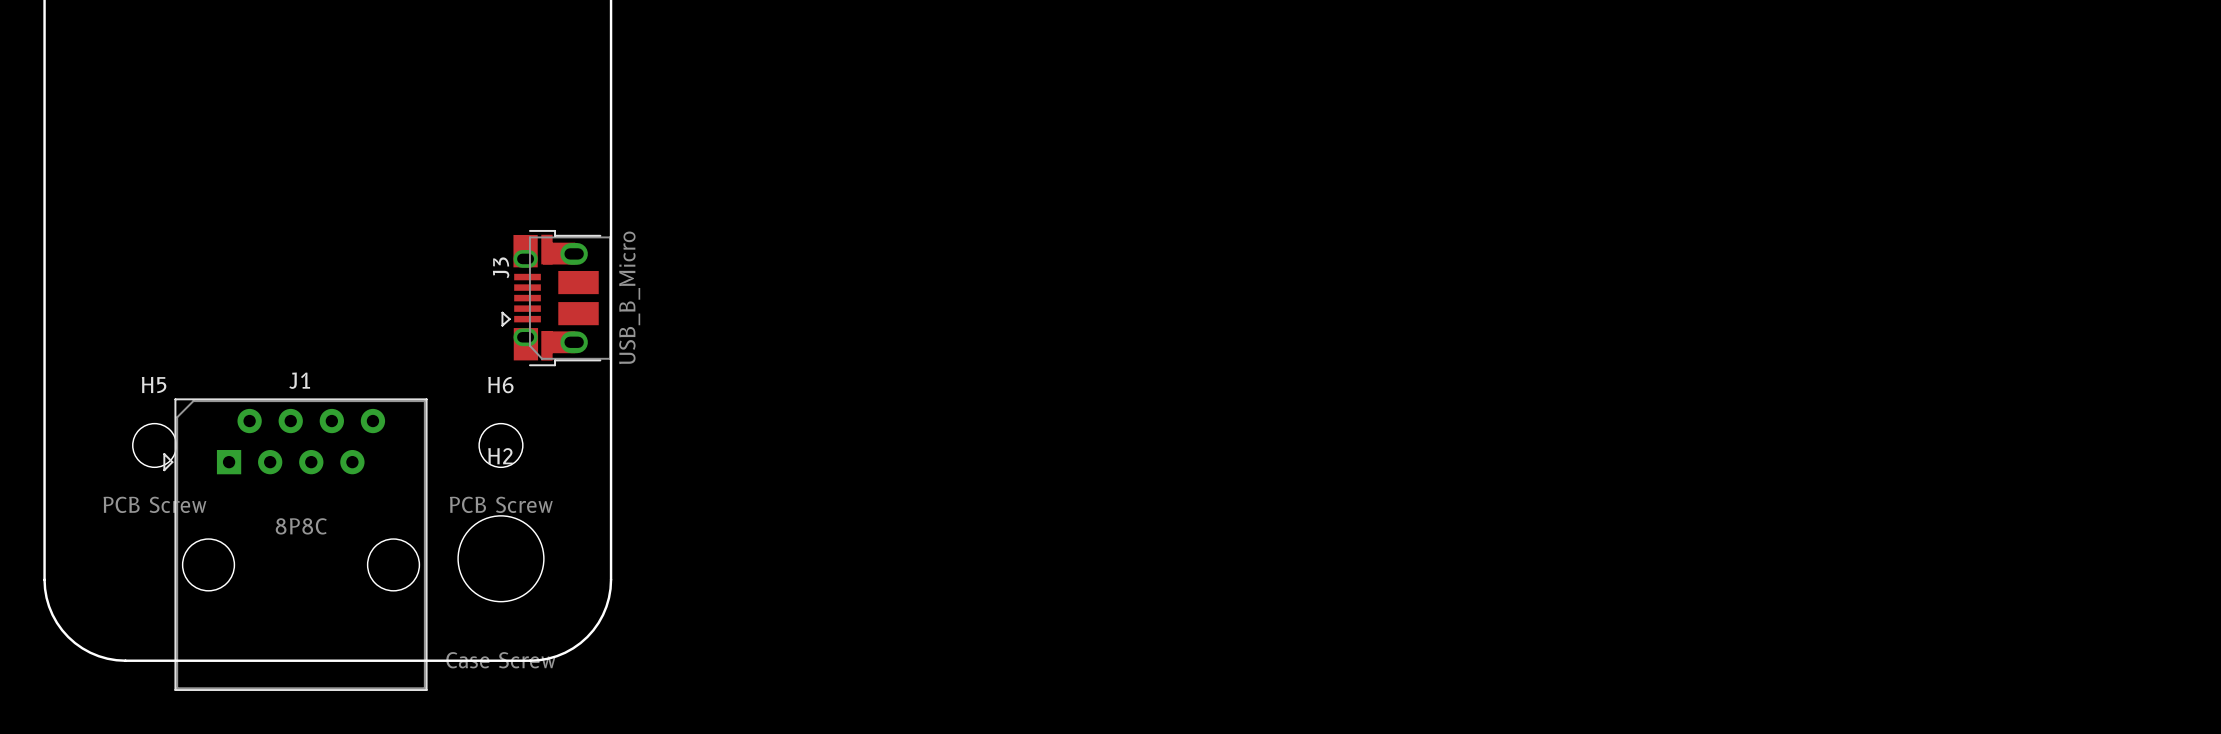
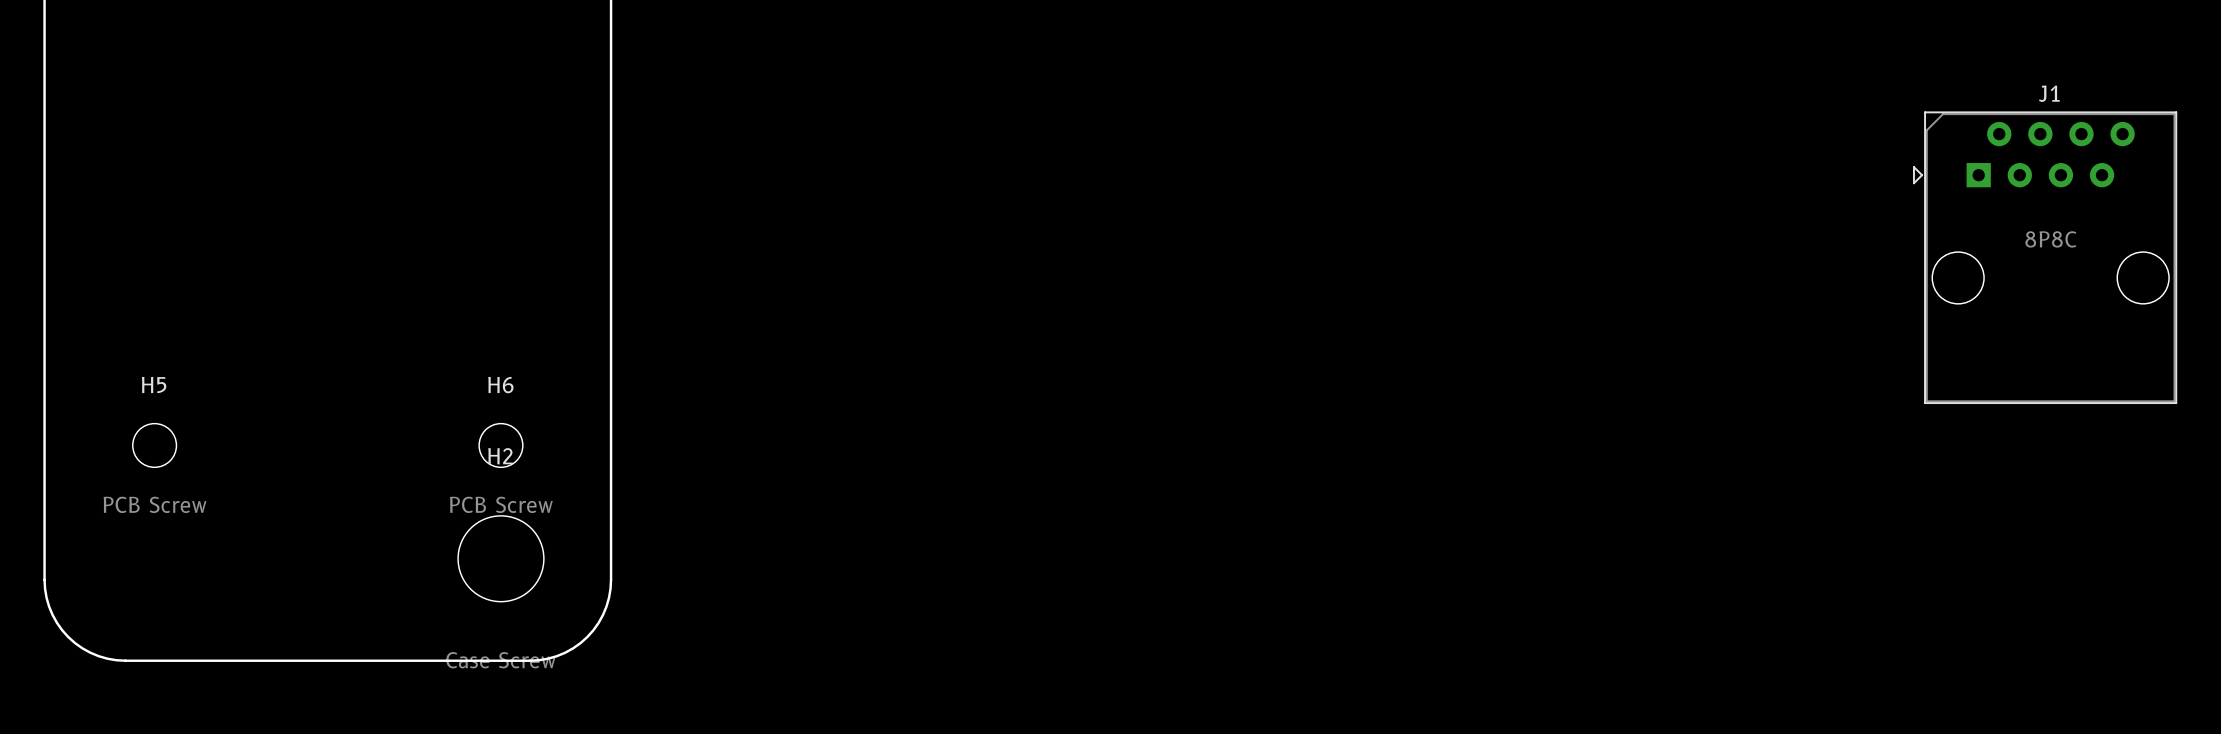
J3: USB_B_Micro (556, 298) -> none
J1 position: (295, 544) -> (2045, 257)

